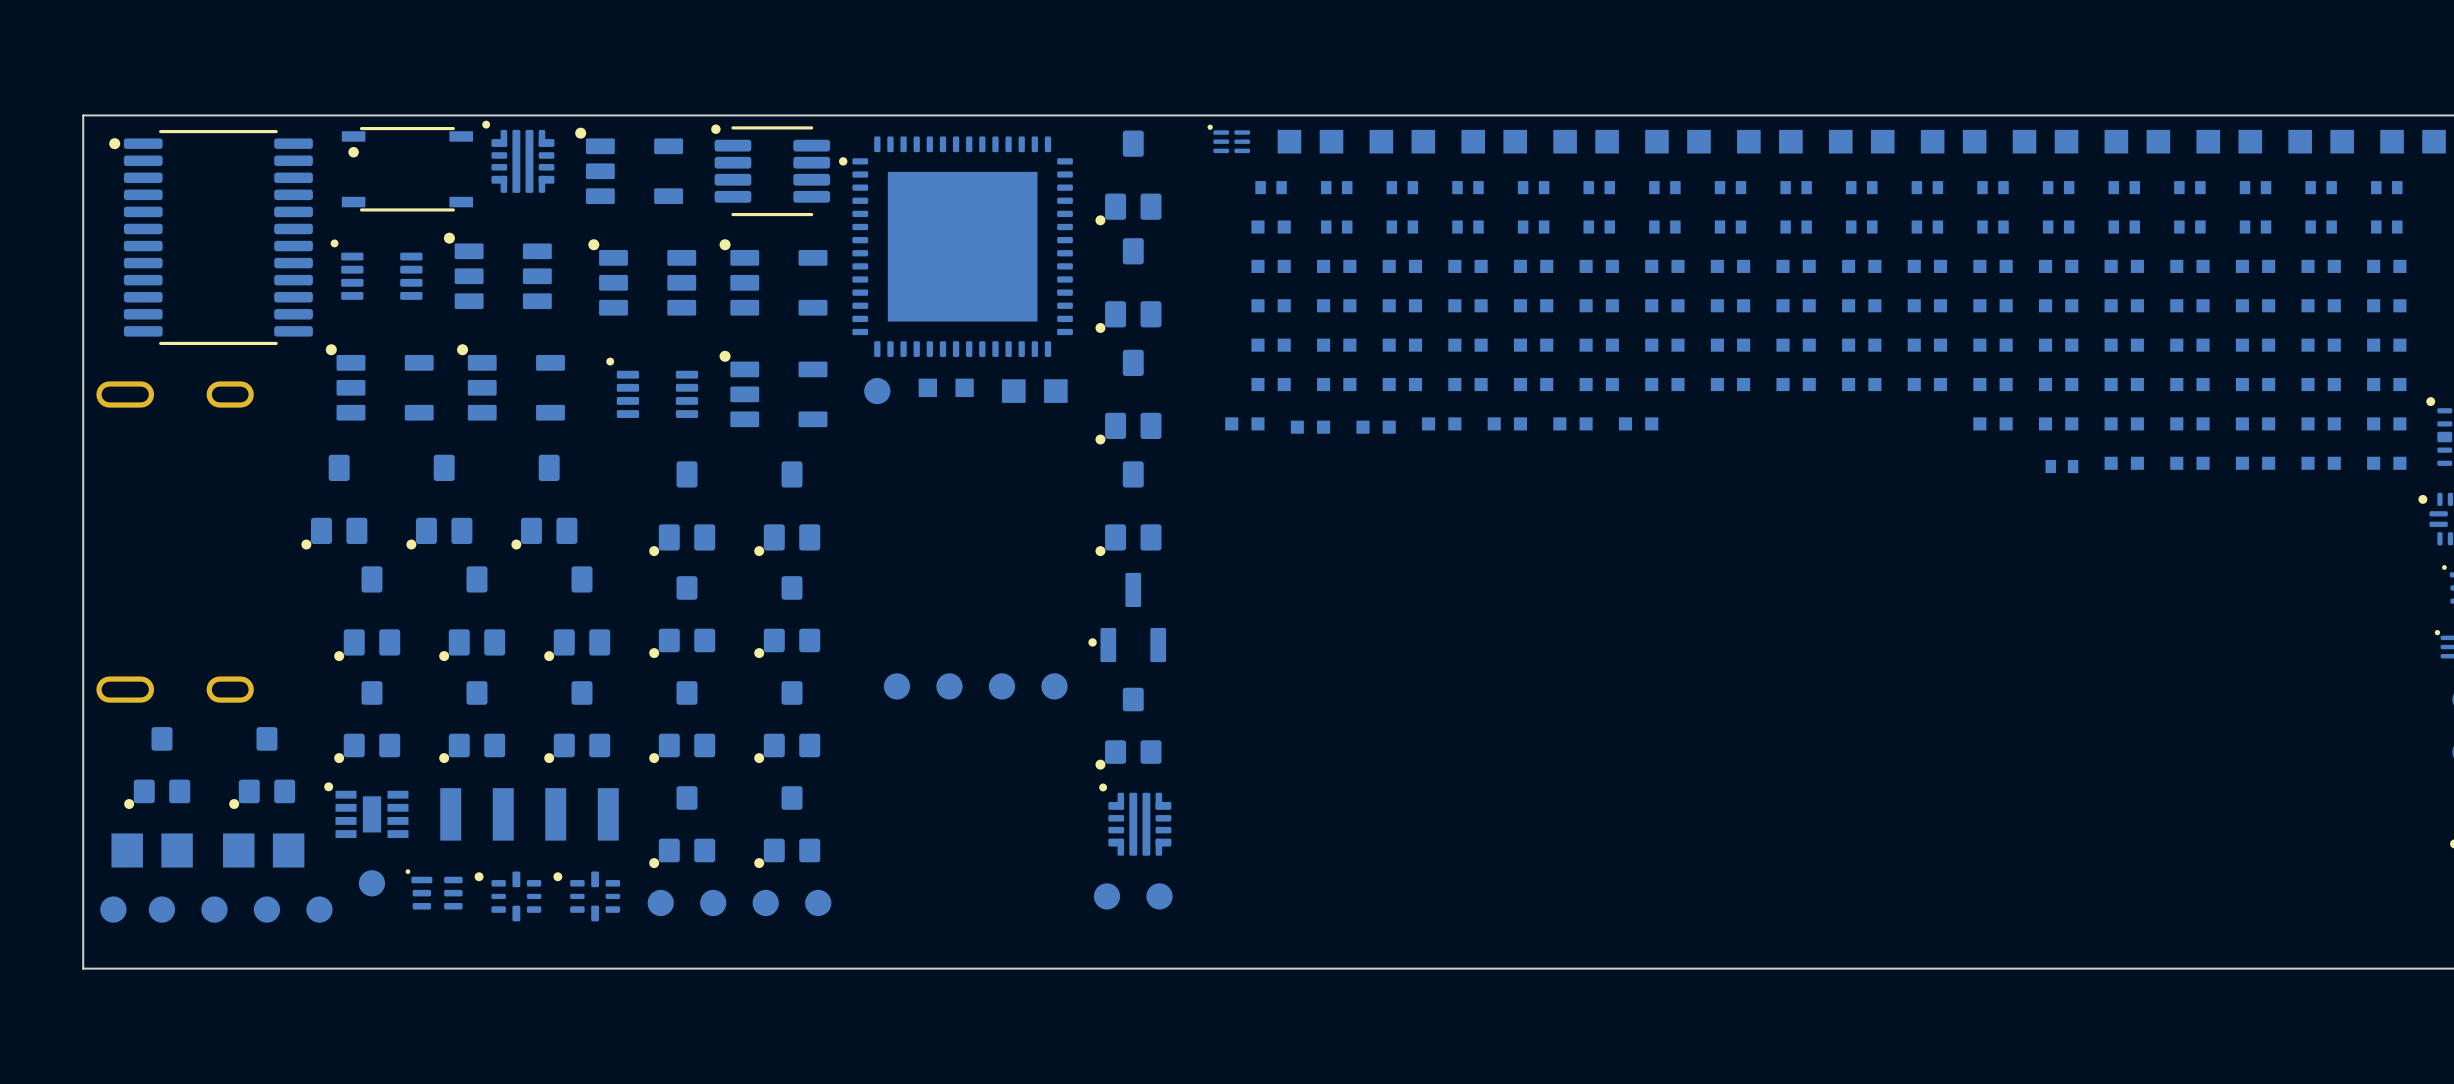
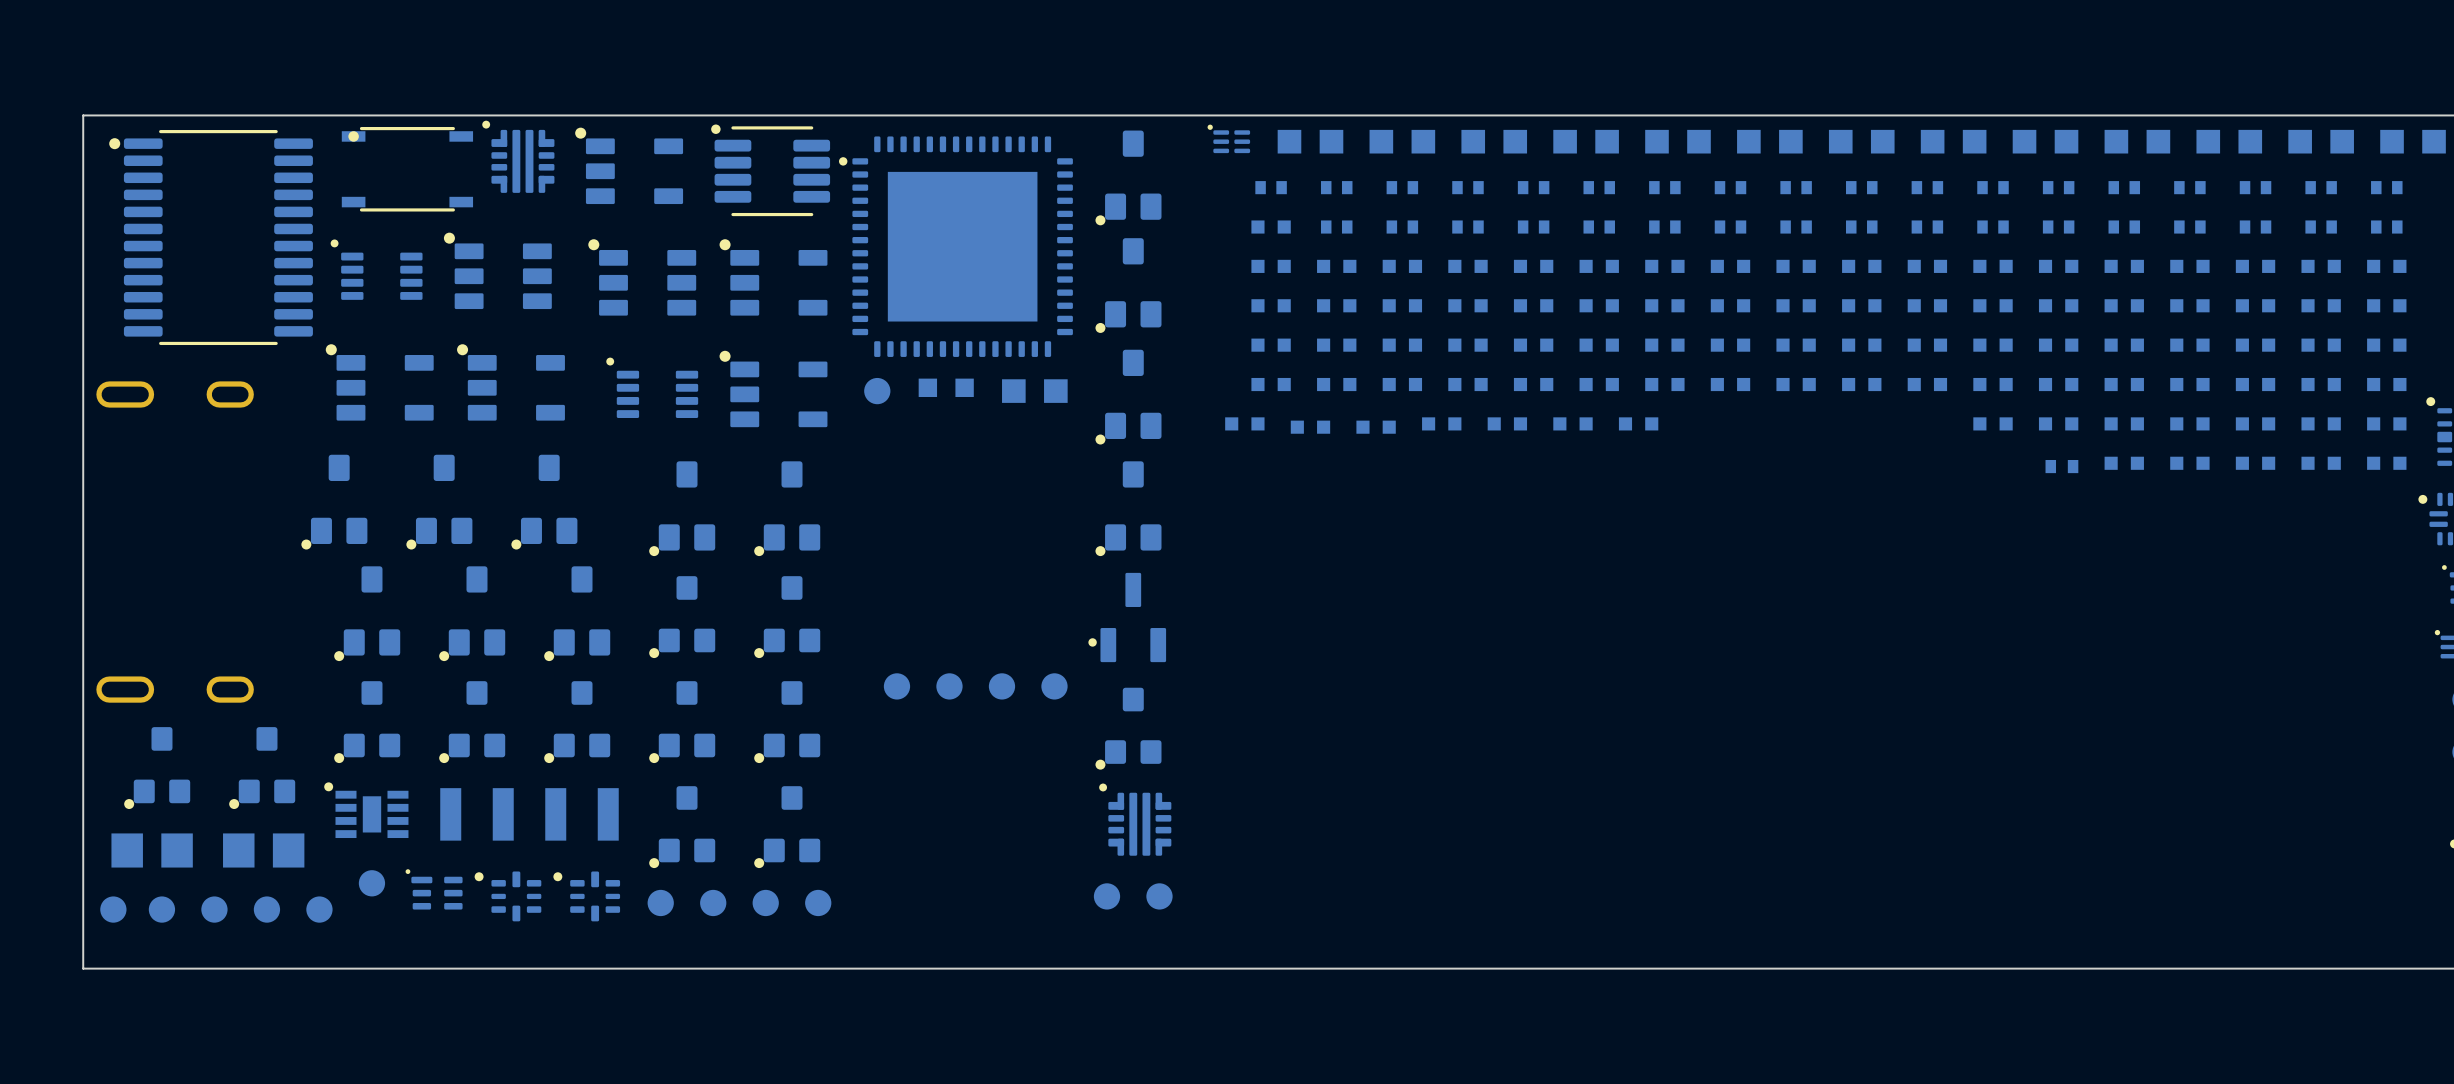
part footprint: [341, 126, 474, 212] -> [341, 126, 474, 212]

